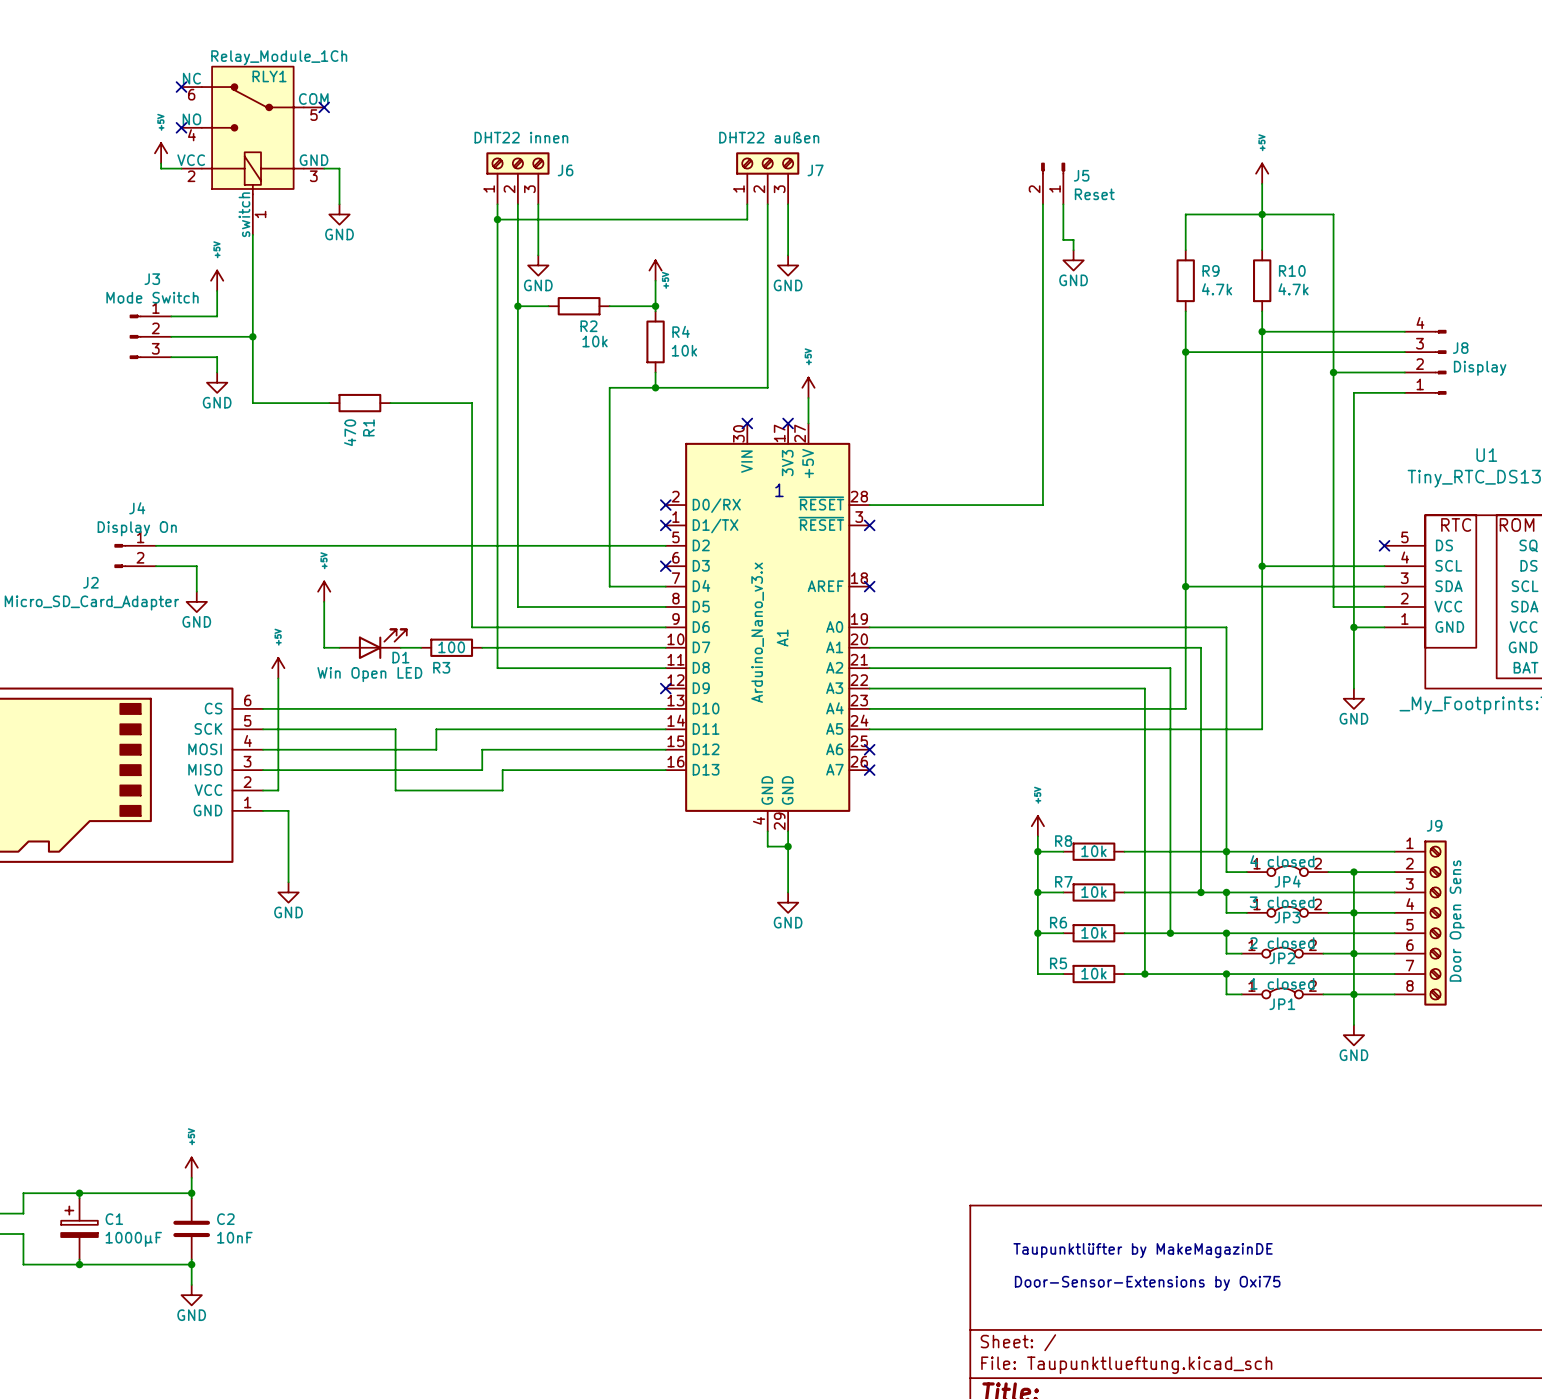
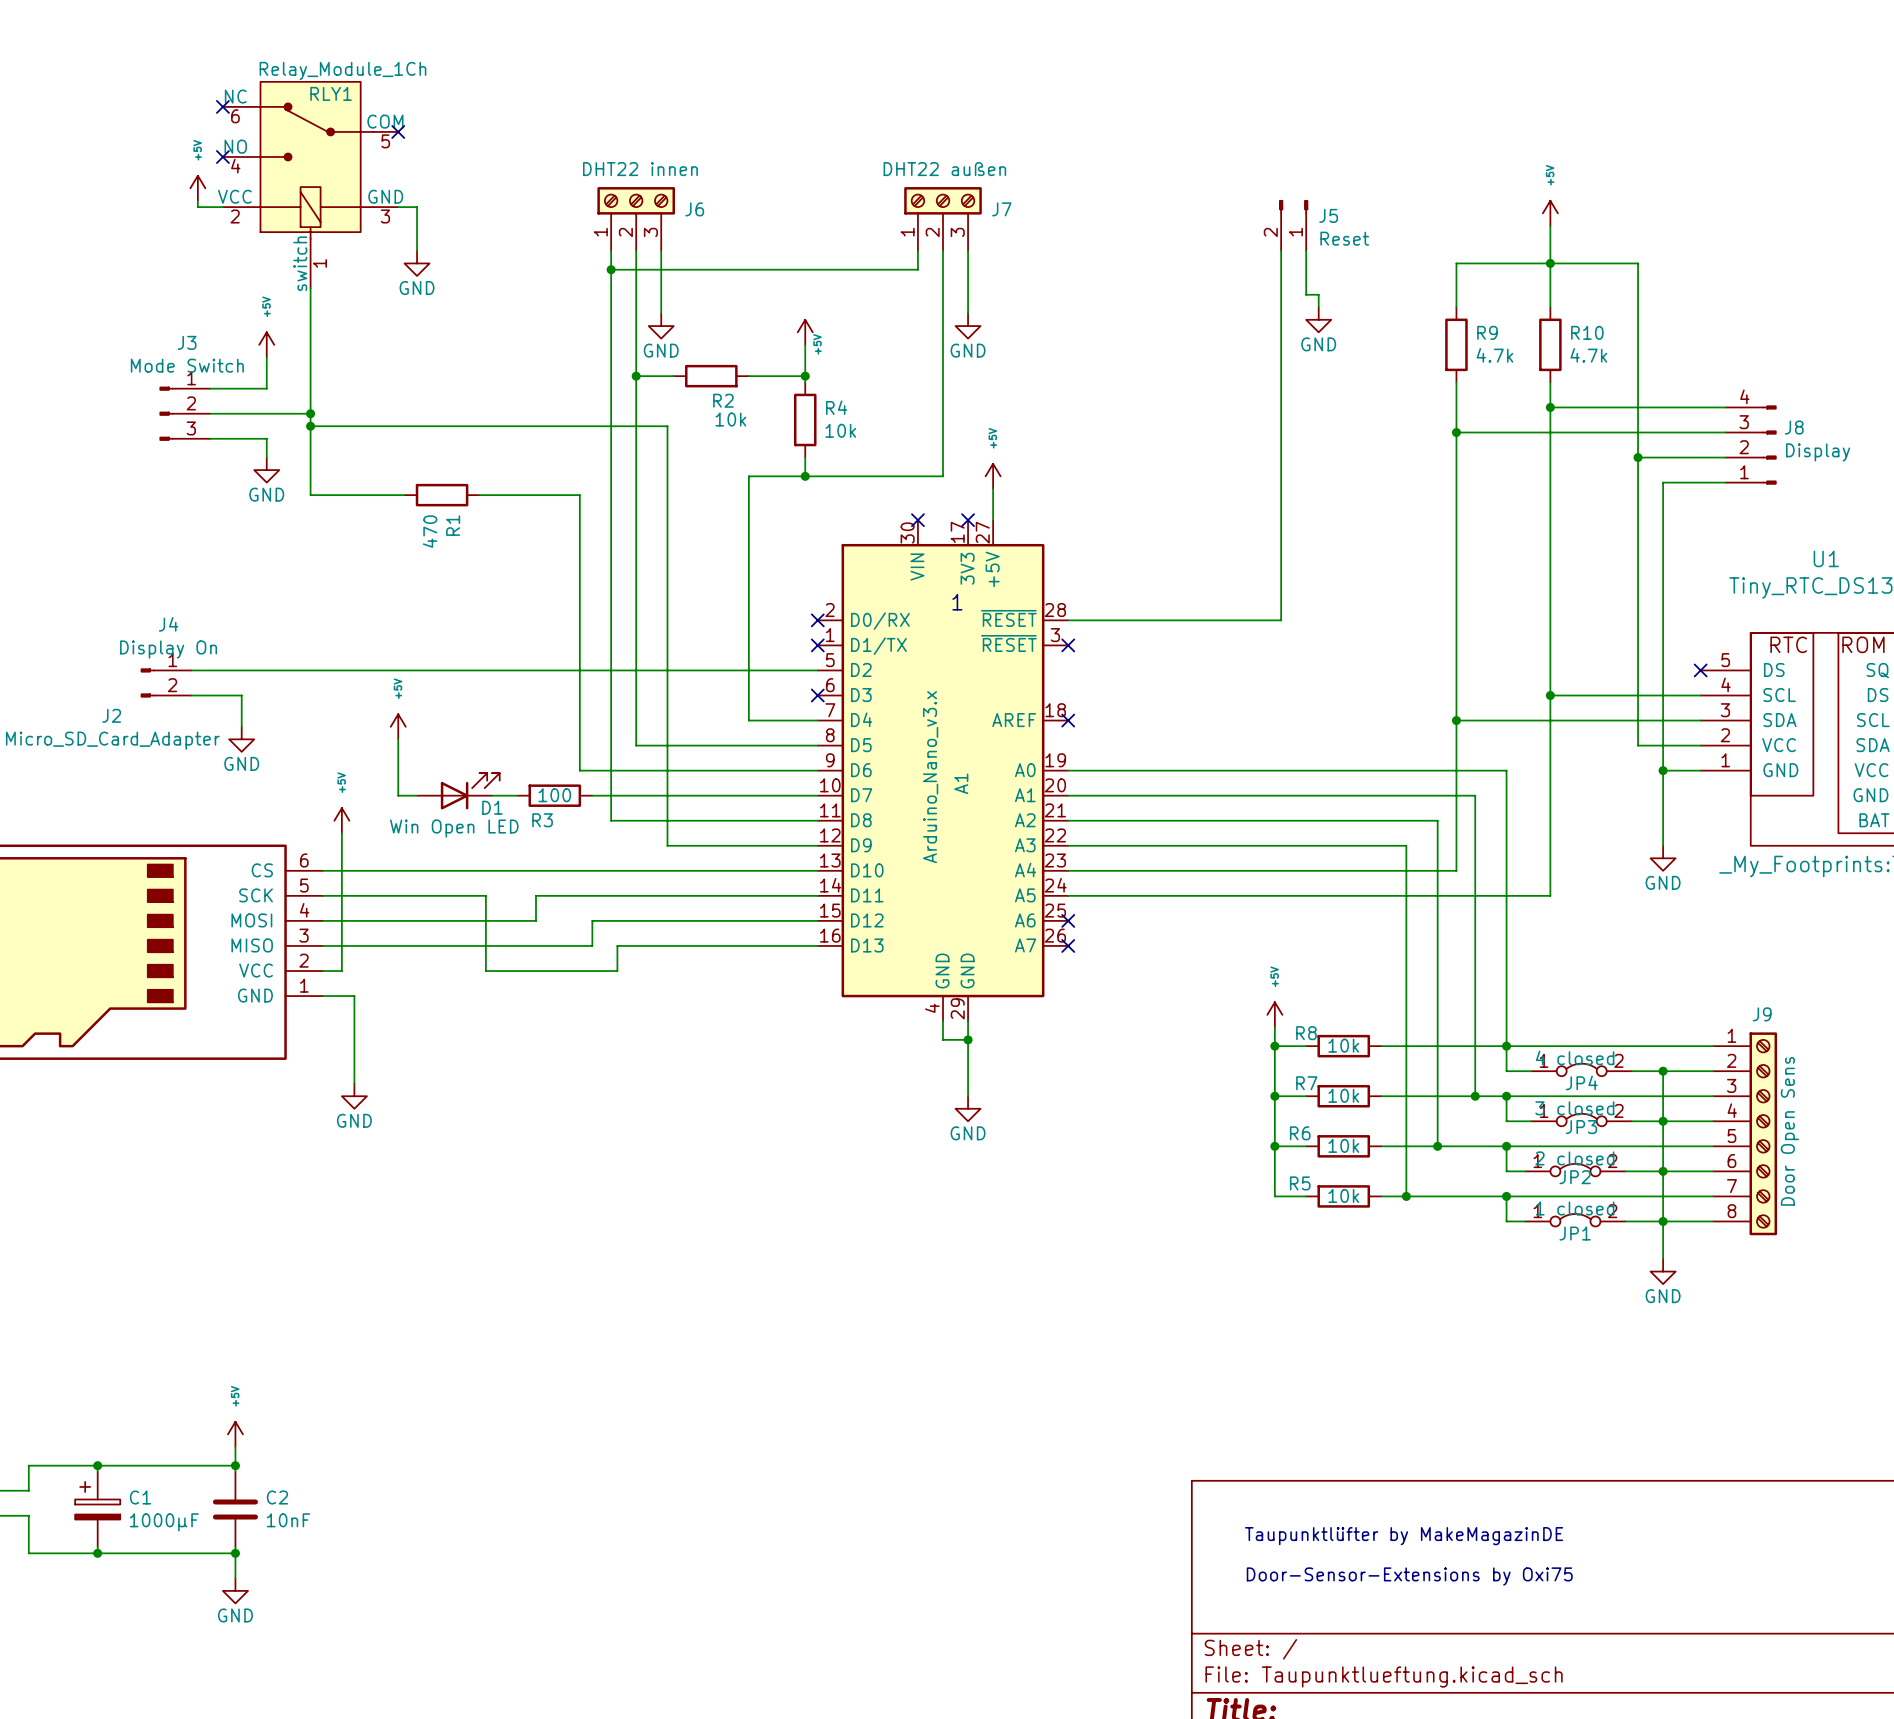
wire: none -> (310, 426) (667, 426) (667, 845) (817, 845)
junction: none -> (310, 426)
no-connect mark: (665, 688) -> none

